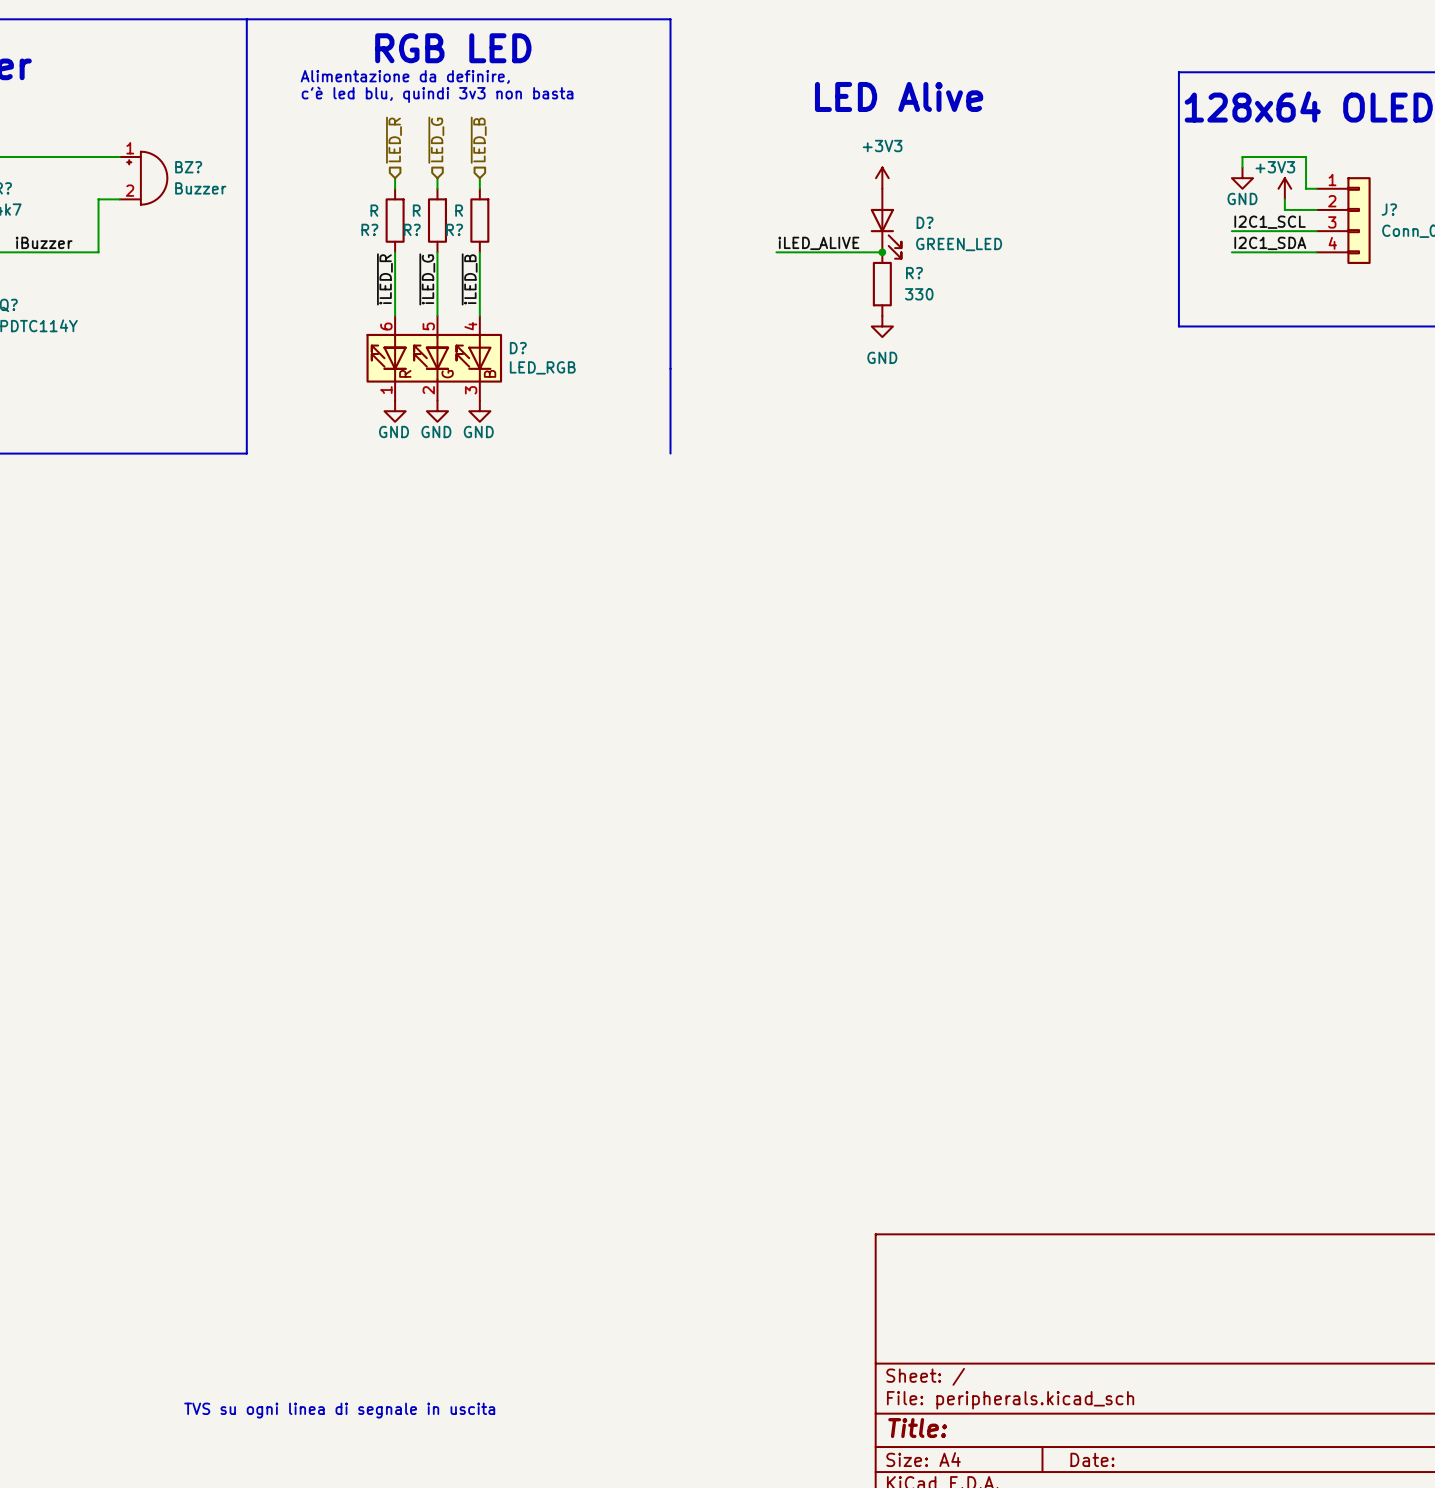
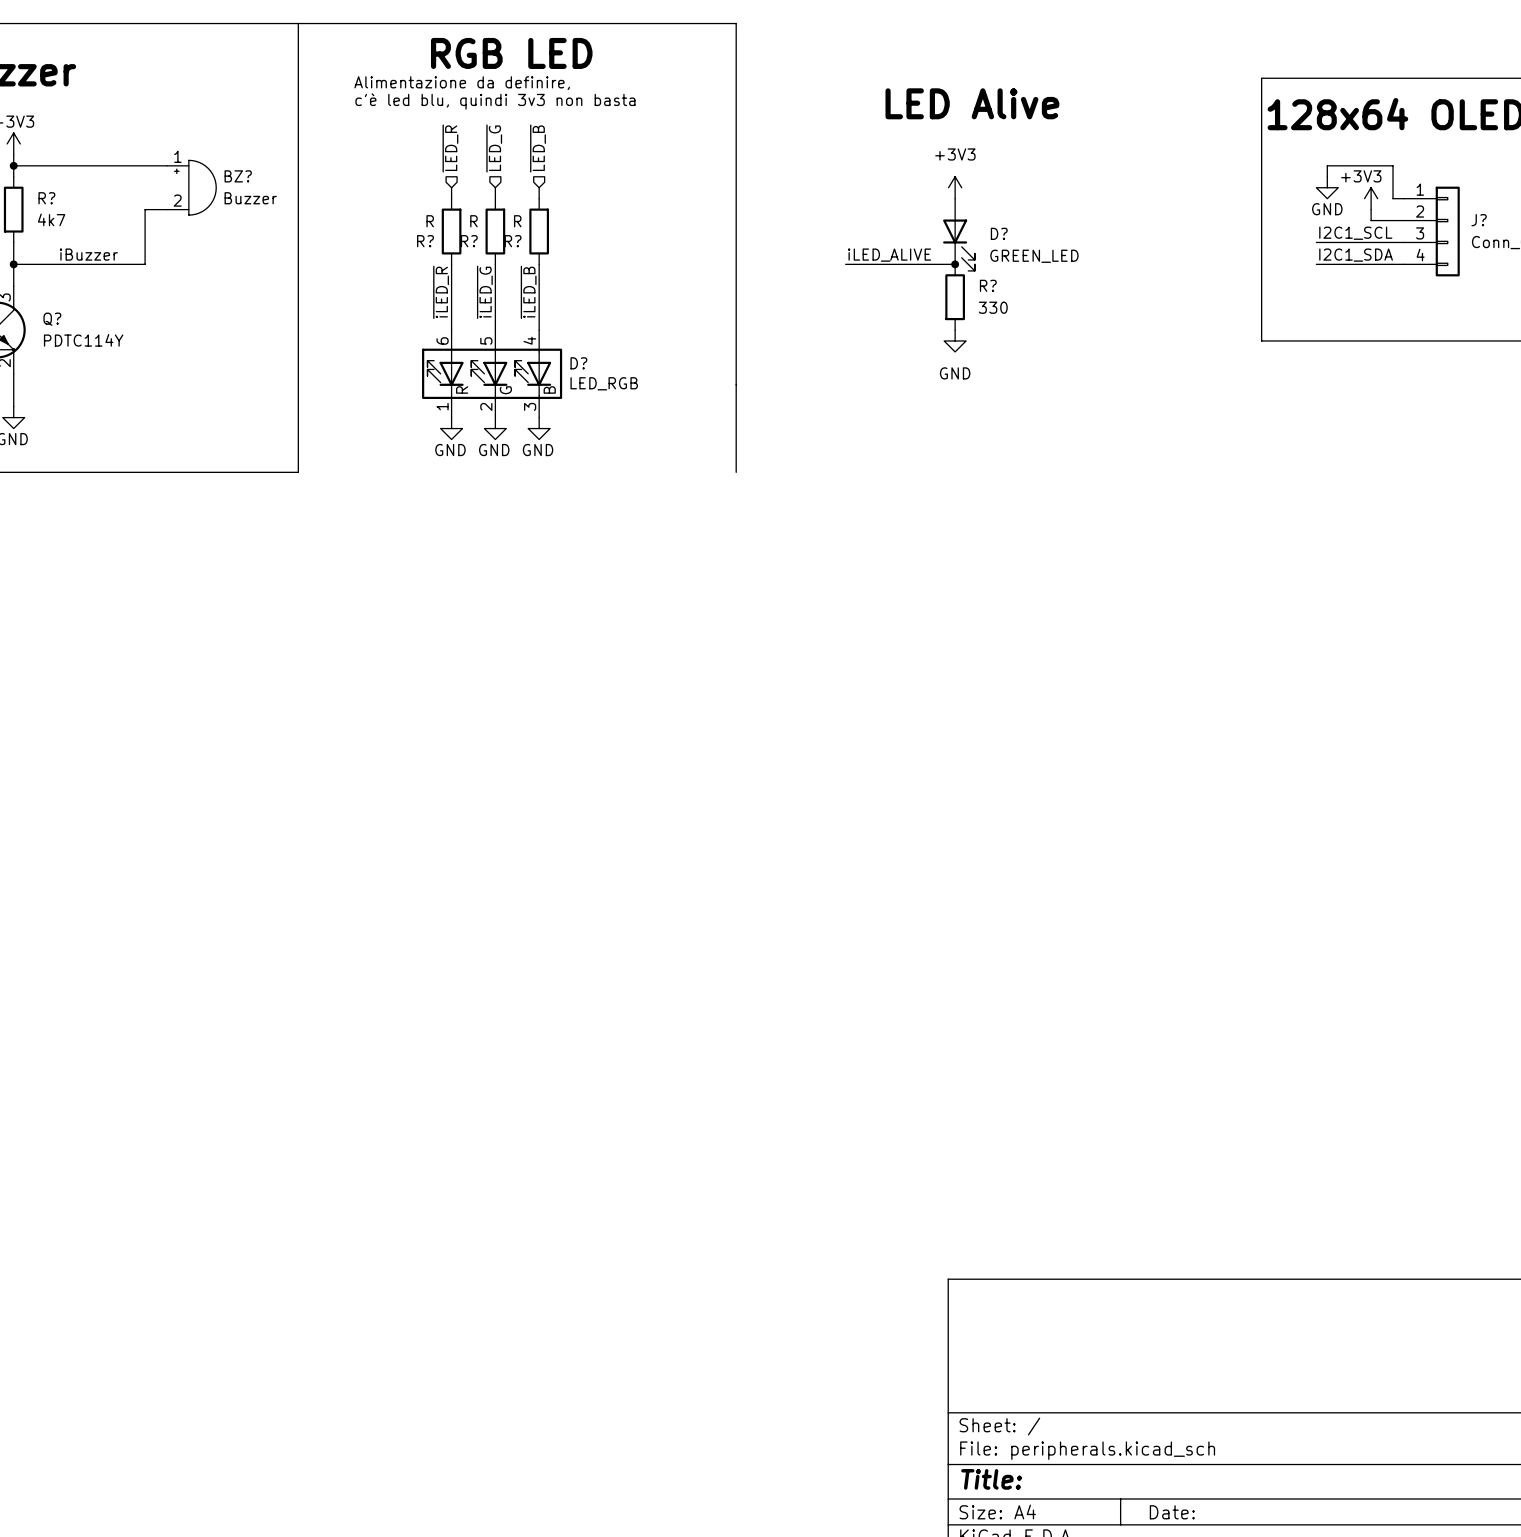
text: TVS su ogni linea di segnale in uscita (339, 1410) -> none

